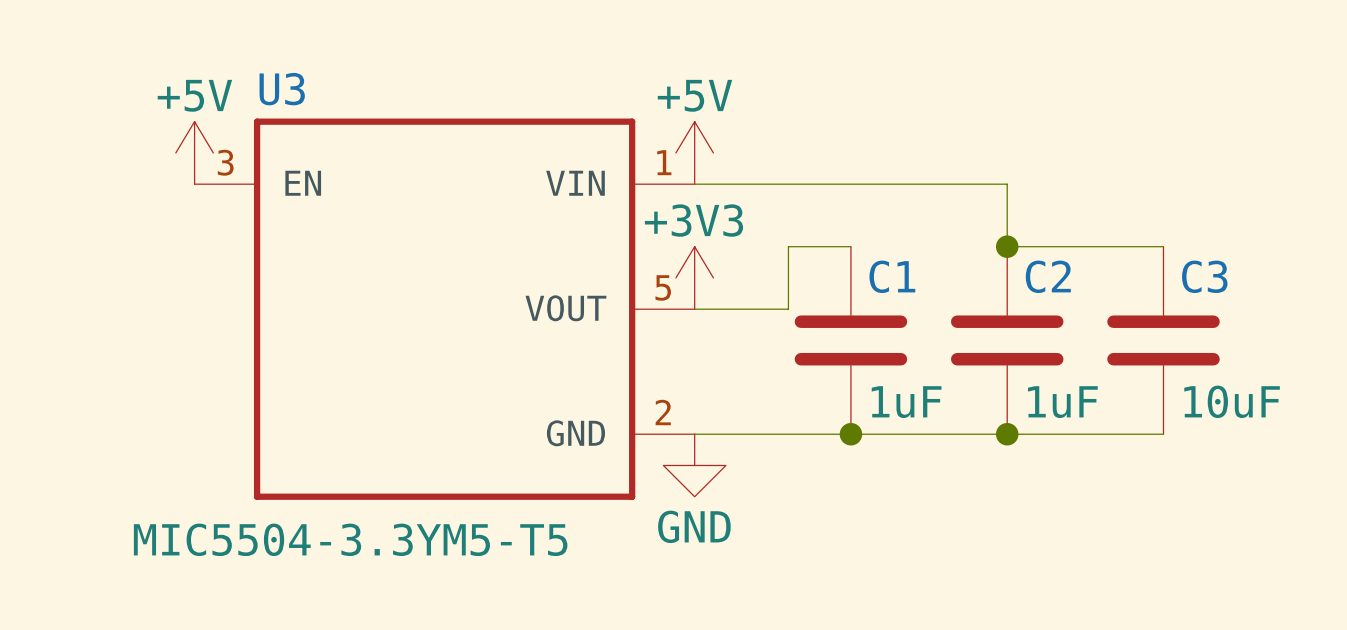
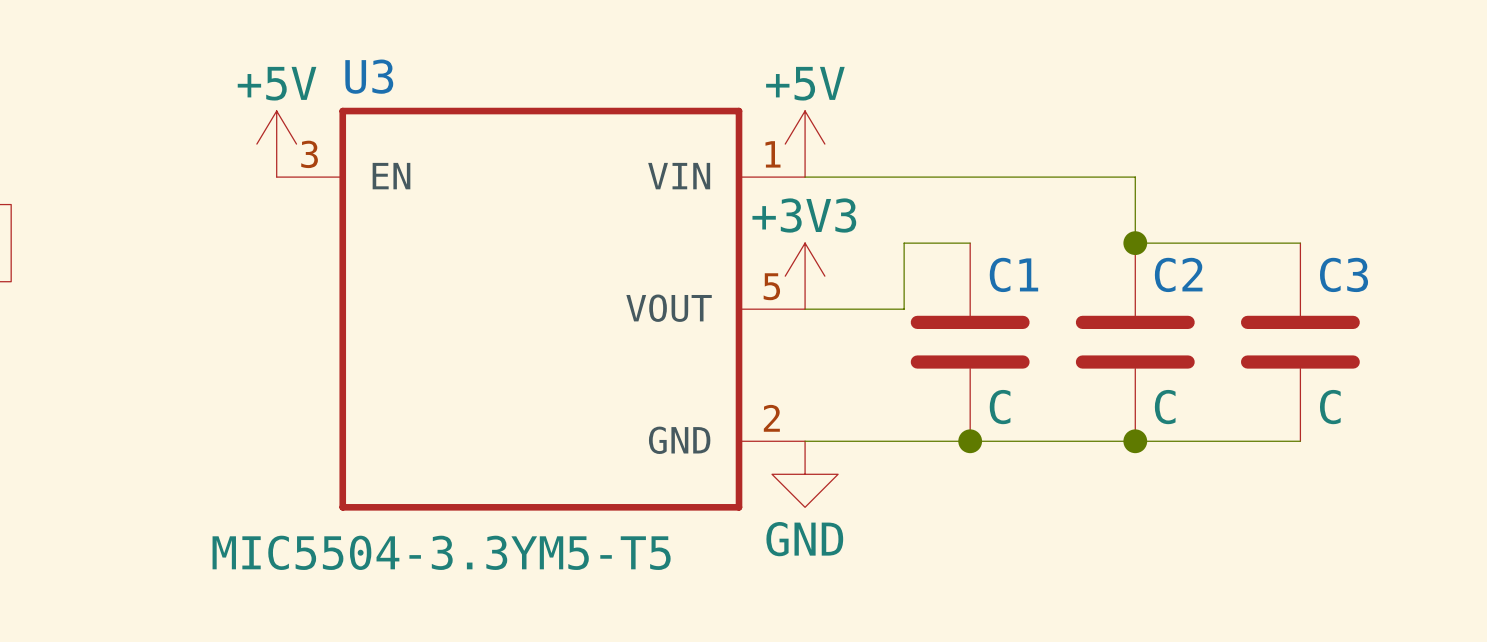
C3 value: 10uF (1232, 401) -> C (1330, 407)
C1 value: 1uF (906, 402) -> C (1000, 407)
C2 value: 1uF (1062, 402) -> C (1165, 407)

